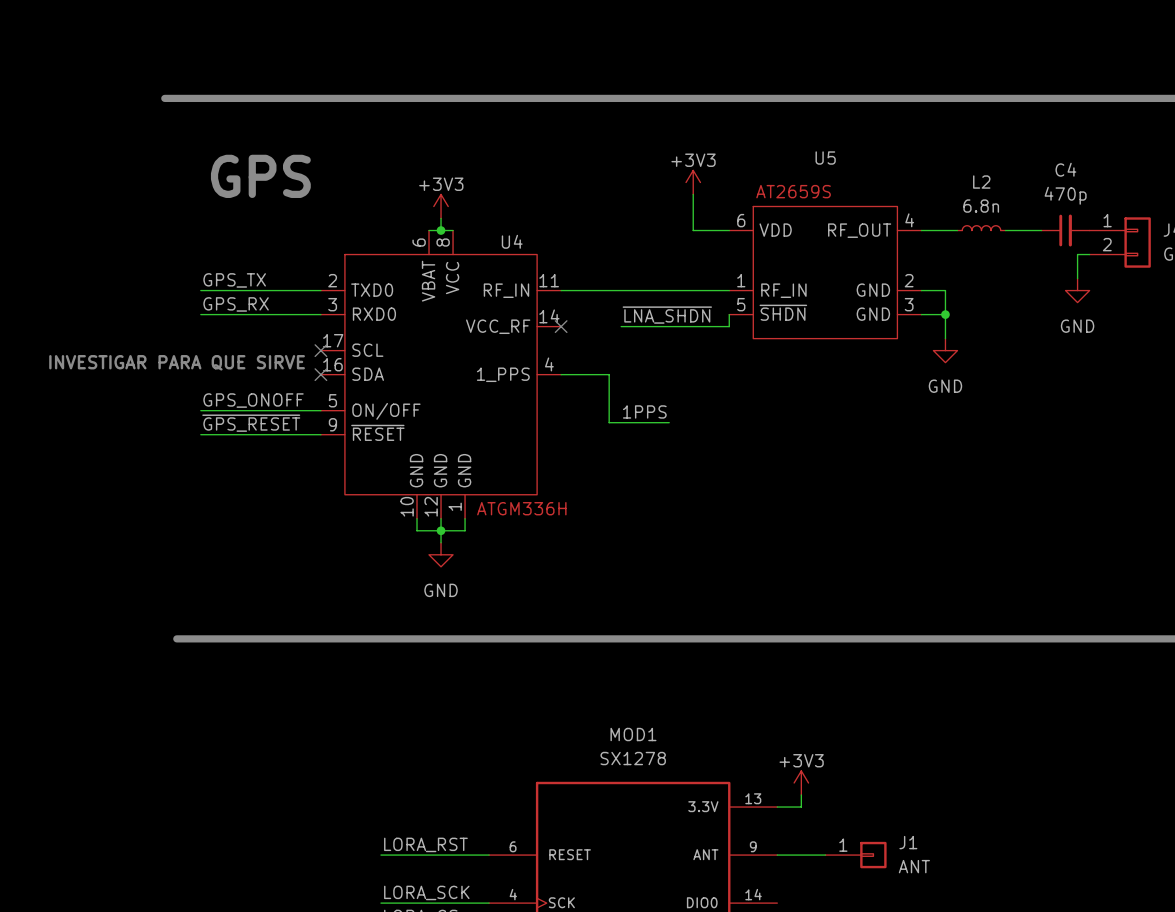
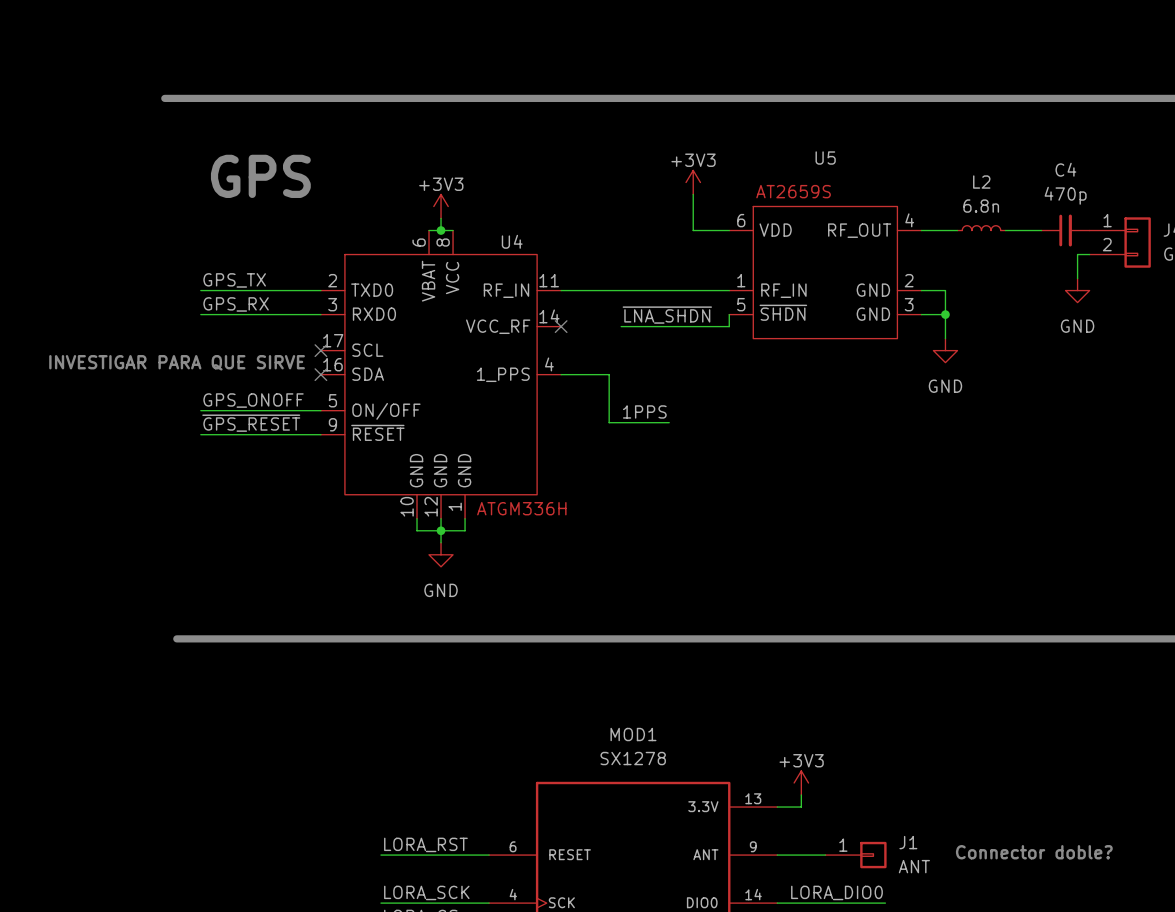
text: none -> Connector doble? (1034, 852)
label: none -> LORA_DIO0 (836, 892)
wire: none -> (777, 903) (885, 903)

